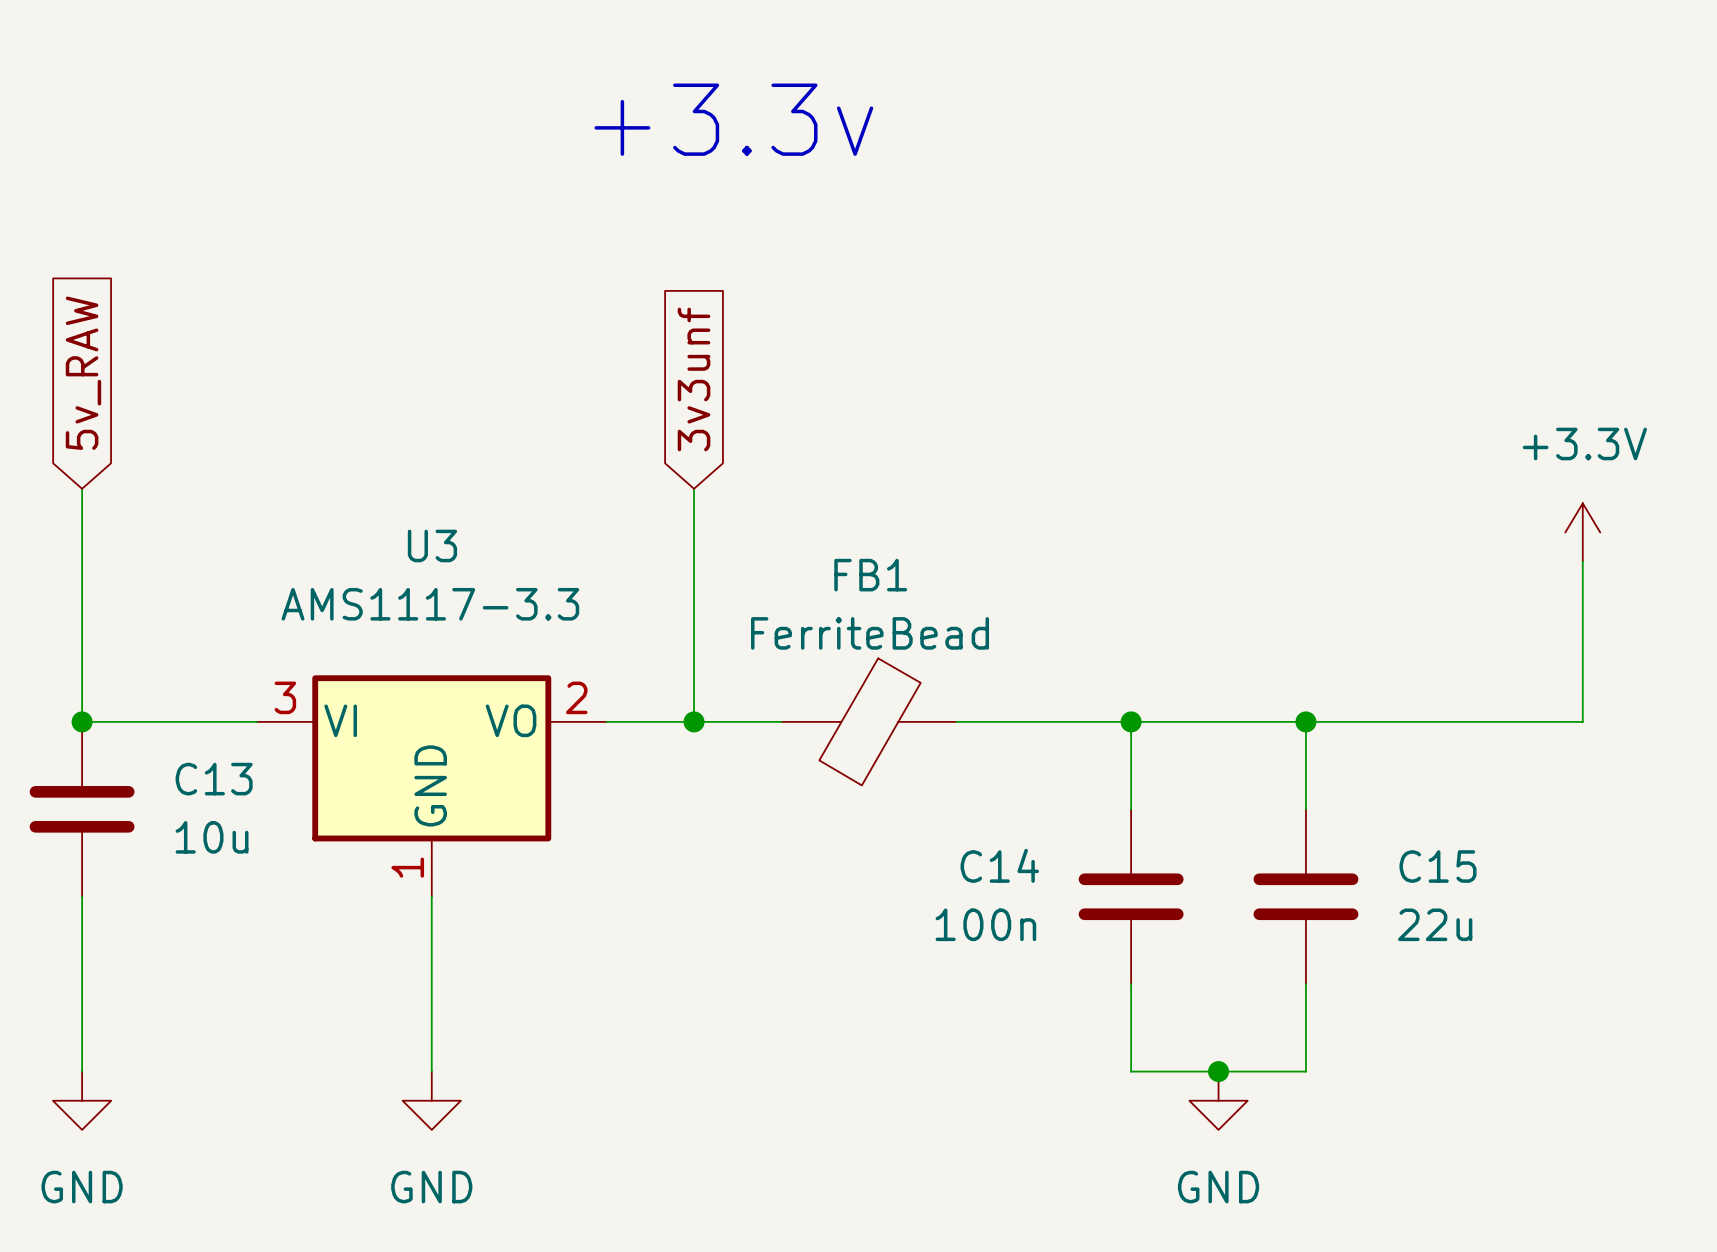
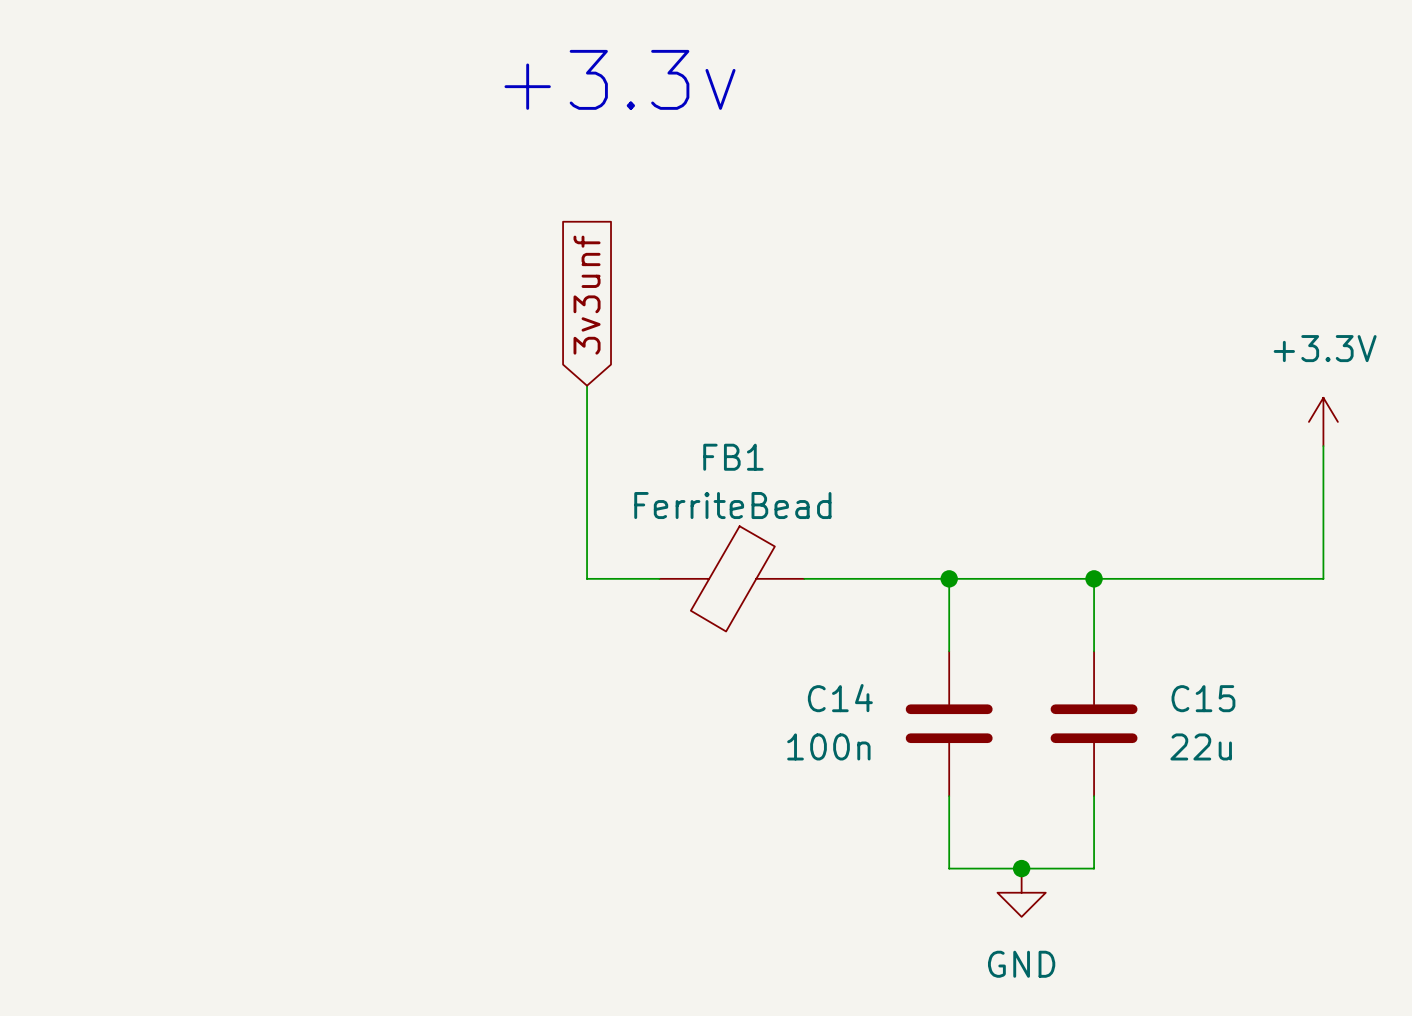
global label: 5v_RAW (83, 373) -> none
wire: (82, 488) (82, 721) (256, 721) -> none
junction: (82, 721) -> none
wire: (606, 721) (694, 721) -> none
junction: (694, 721) -> none
U3: AMS1117-3.3 (431, 786) -> none
C13: 10u (82, 809) -> none
wire: (82, 896) (82, 1071) -> none
wire: (431, 896) (431, 1071) -> none
power symbol: GND (82, 1100) -> none
power symbol: GND (431, 1100) -> none

